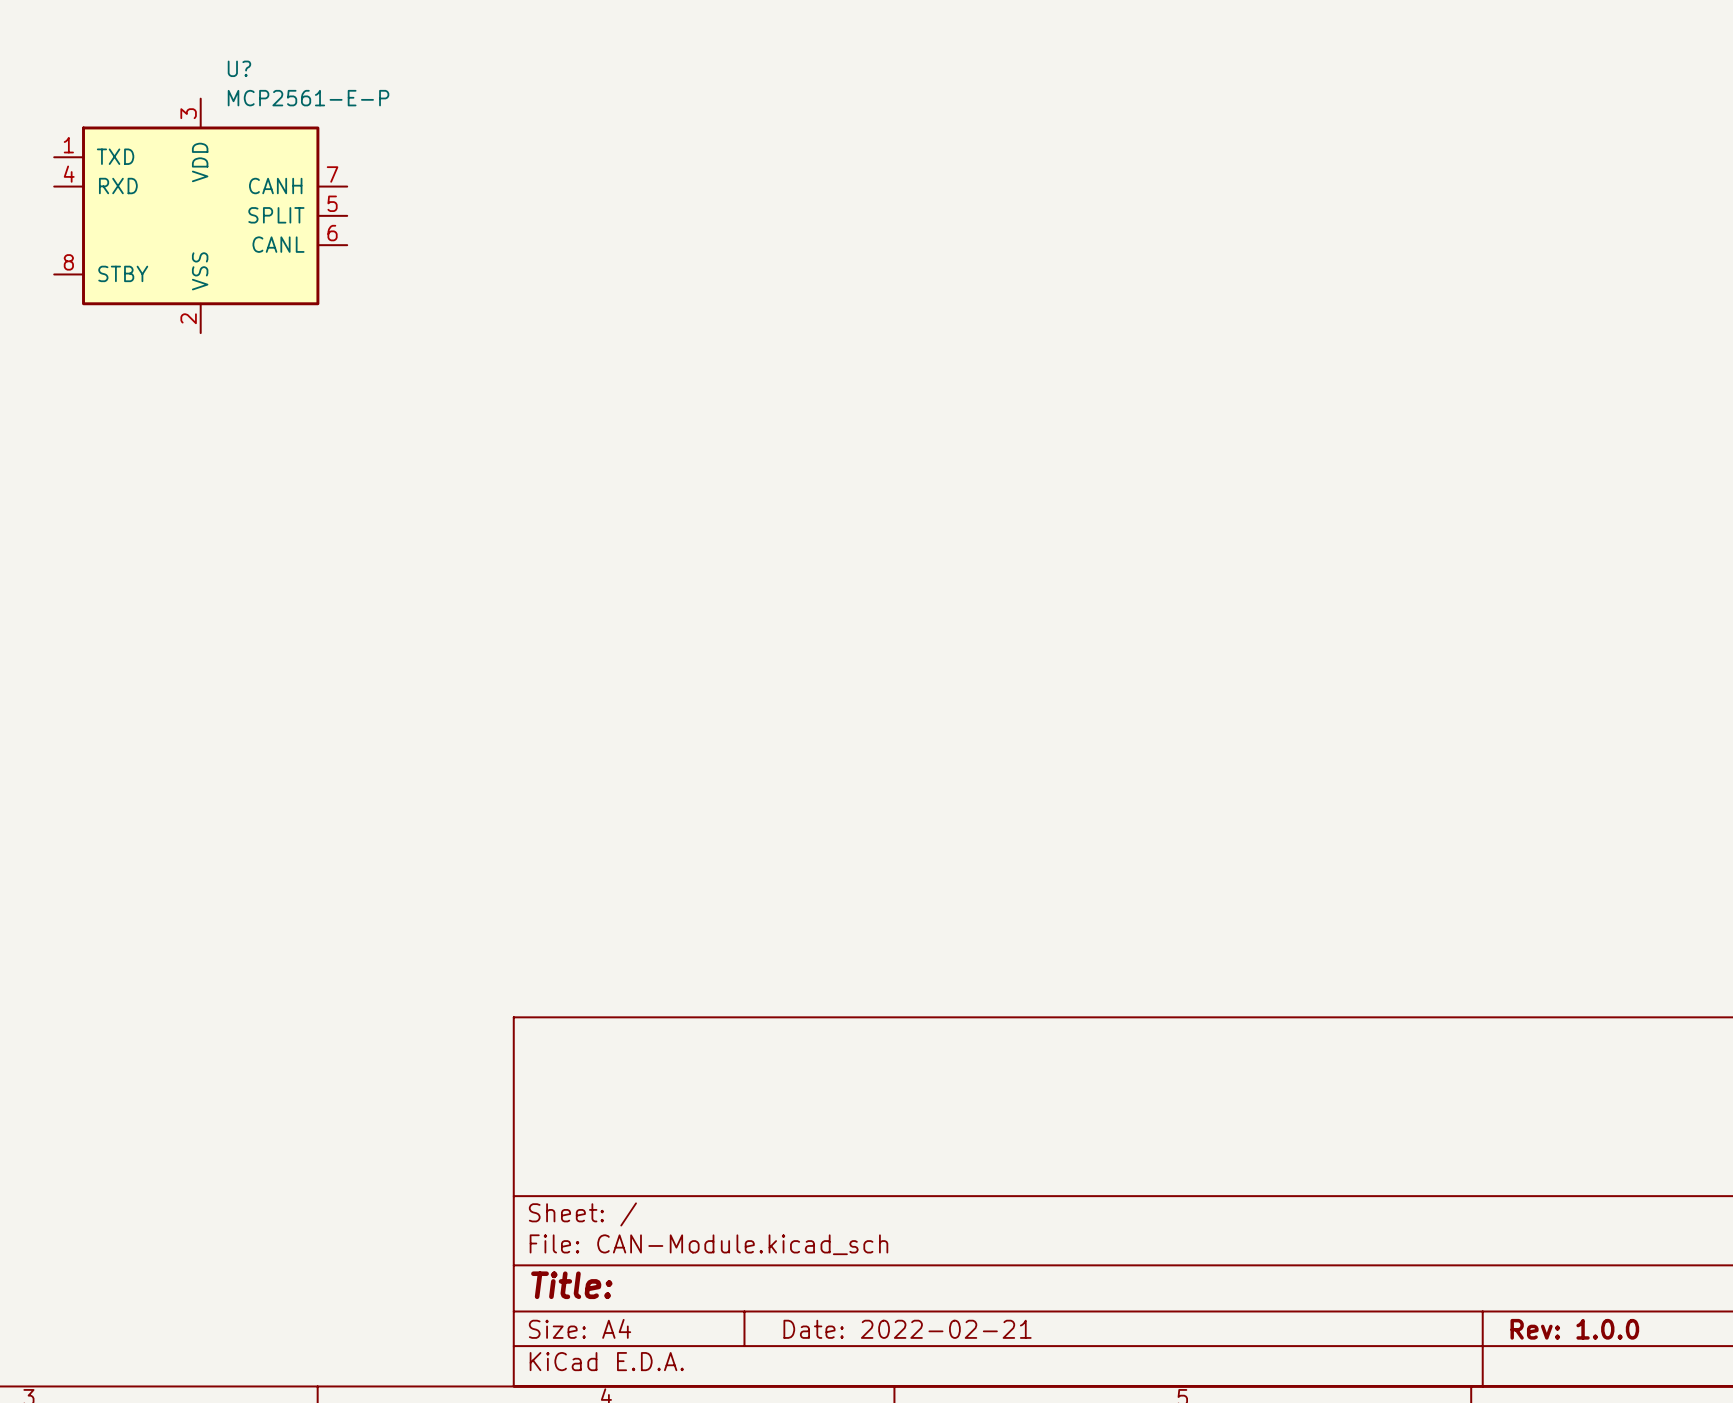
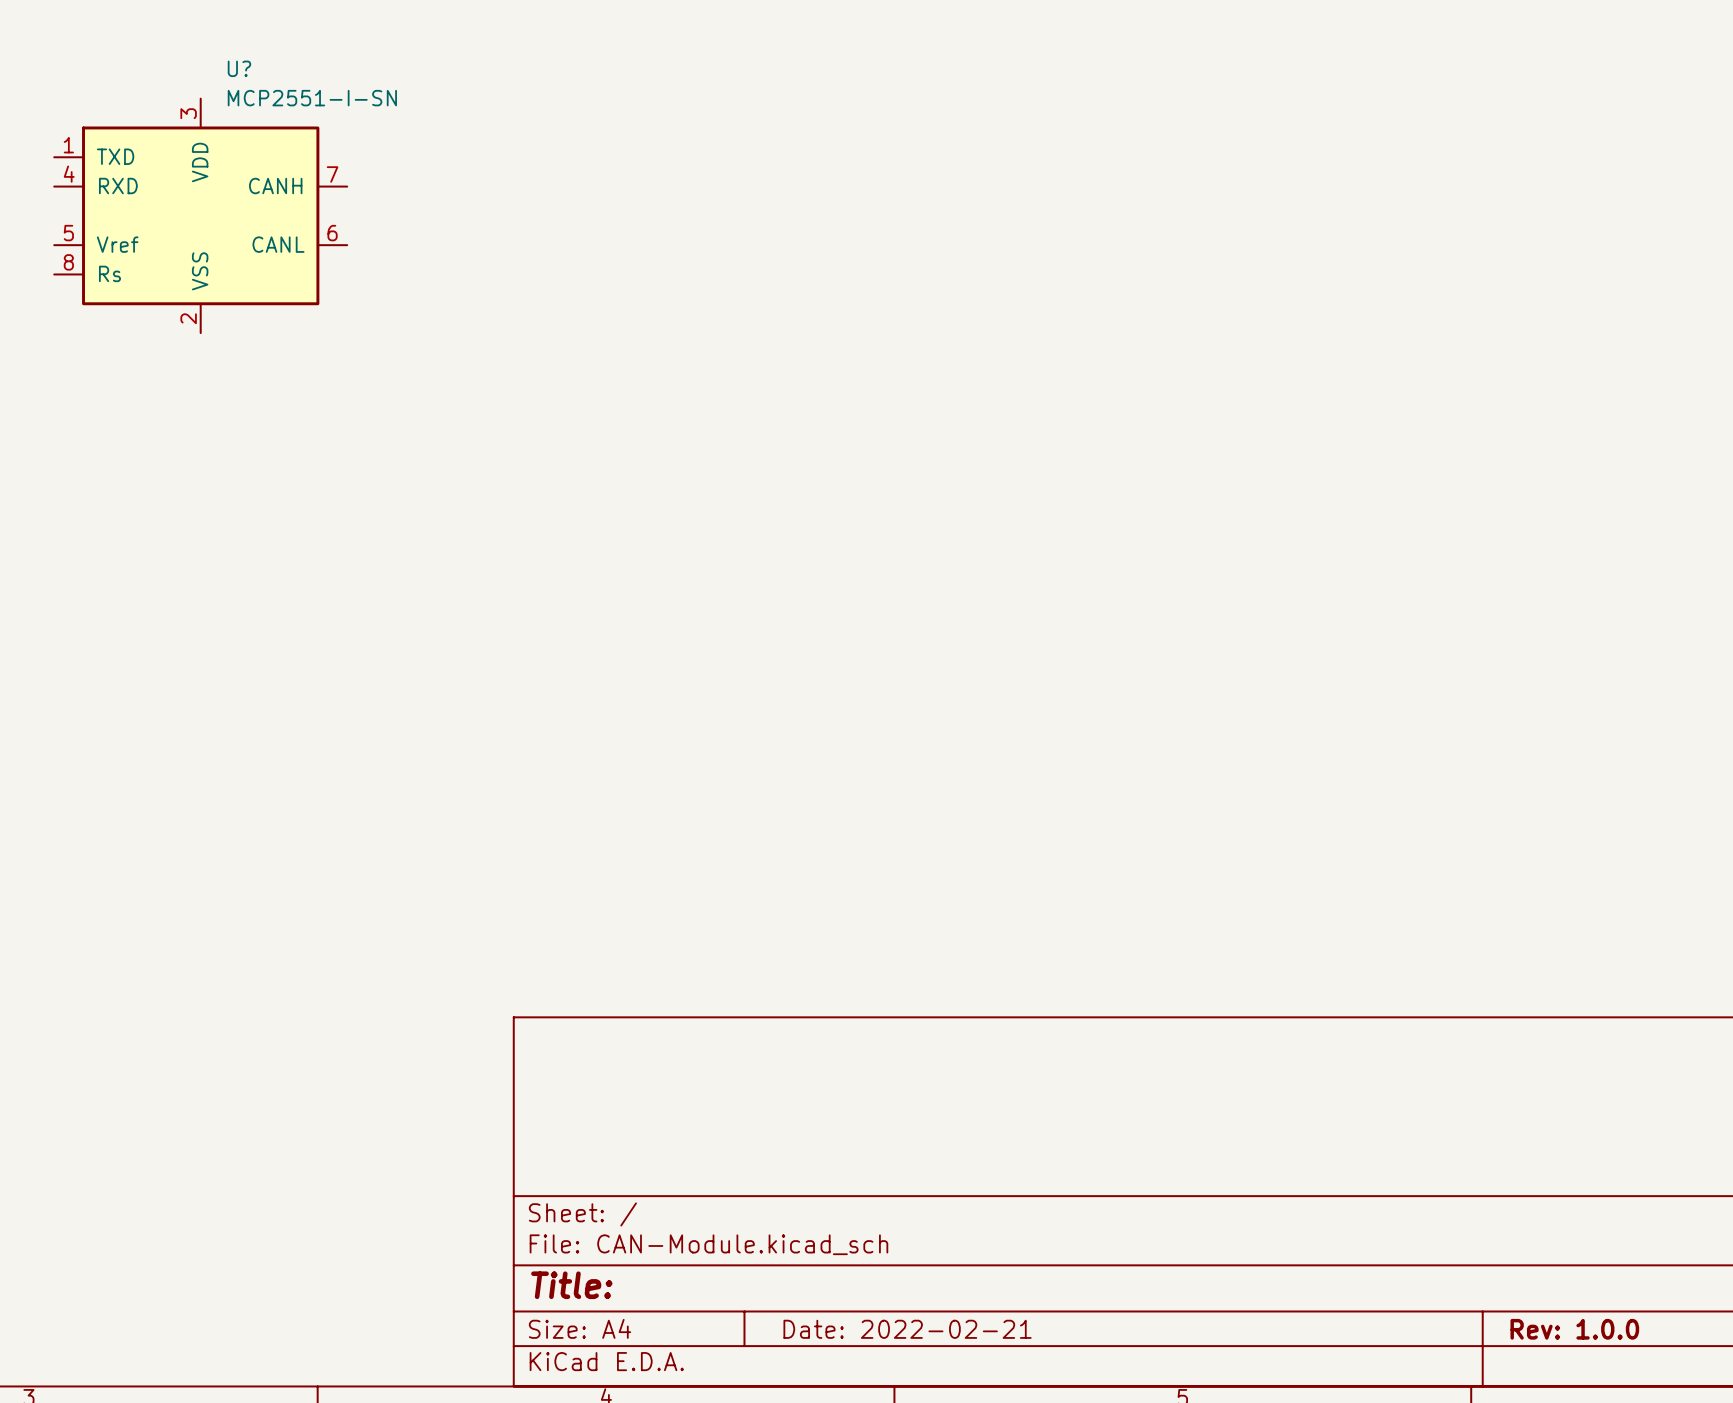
U? symbol: [54, 98, 348, 334] -> [54, 98, 348, 334]
U? value: MCP2561-E-P (308, 98) -> MCP2551-I-SN (312, 98)

